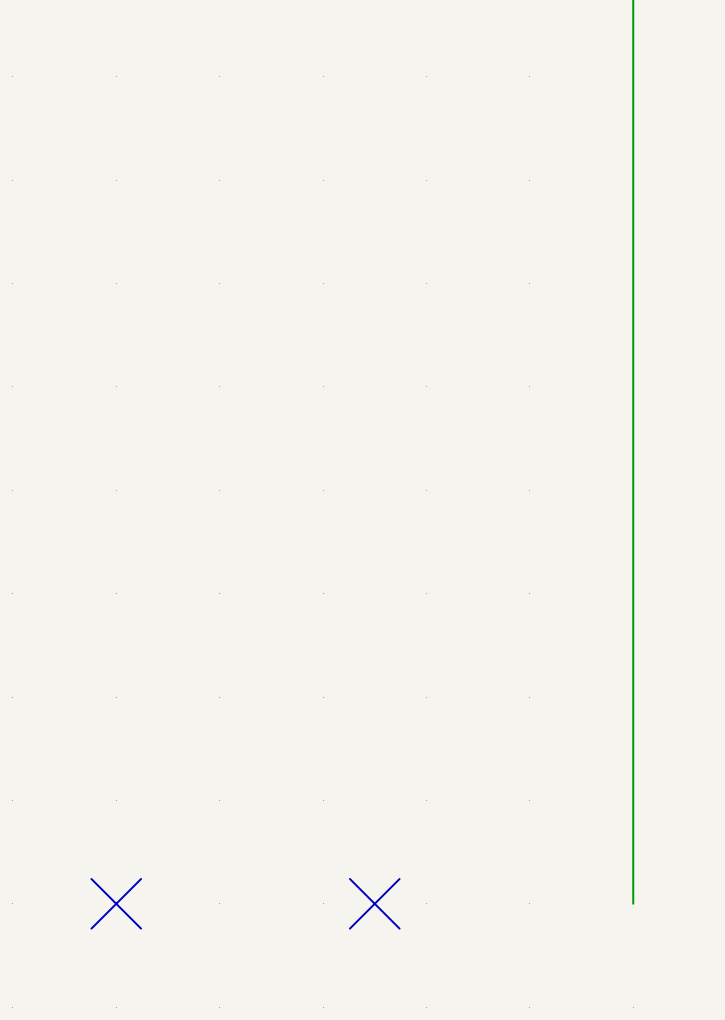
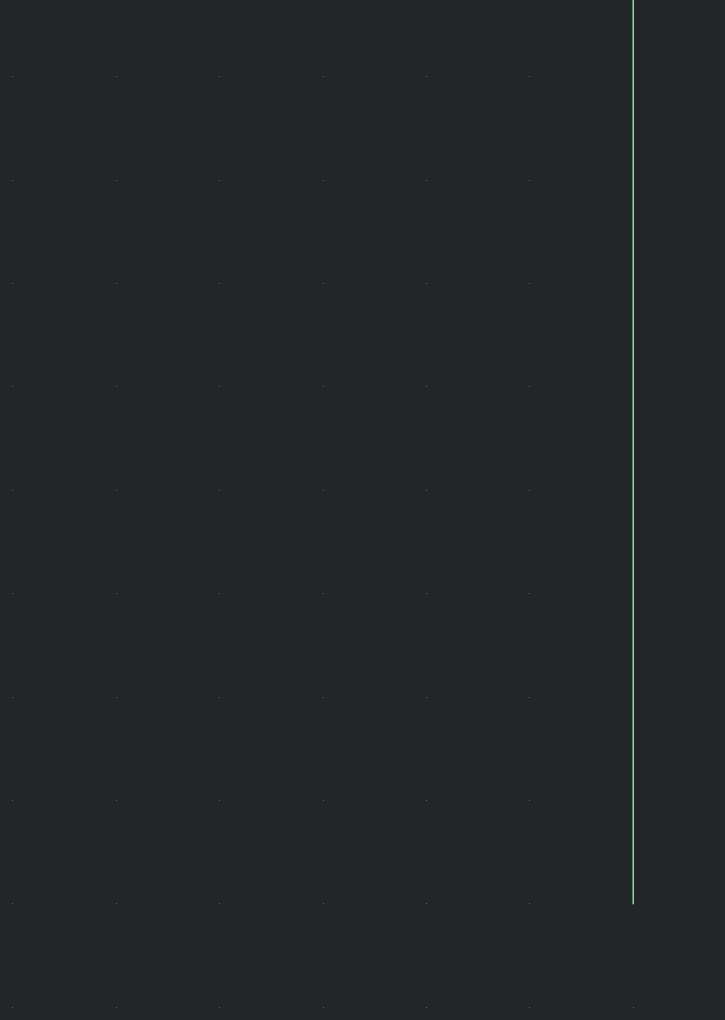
no-connect mark: (116, 903) -> none
no-connect mark: (374, 903) -> none

